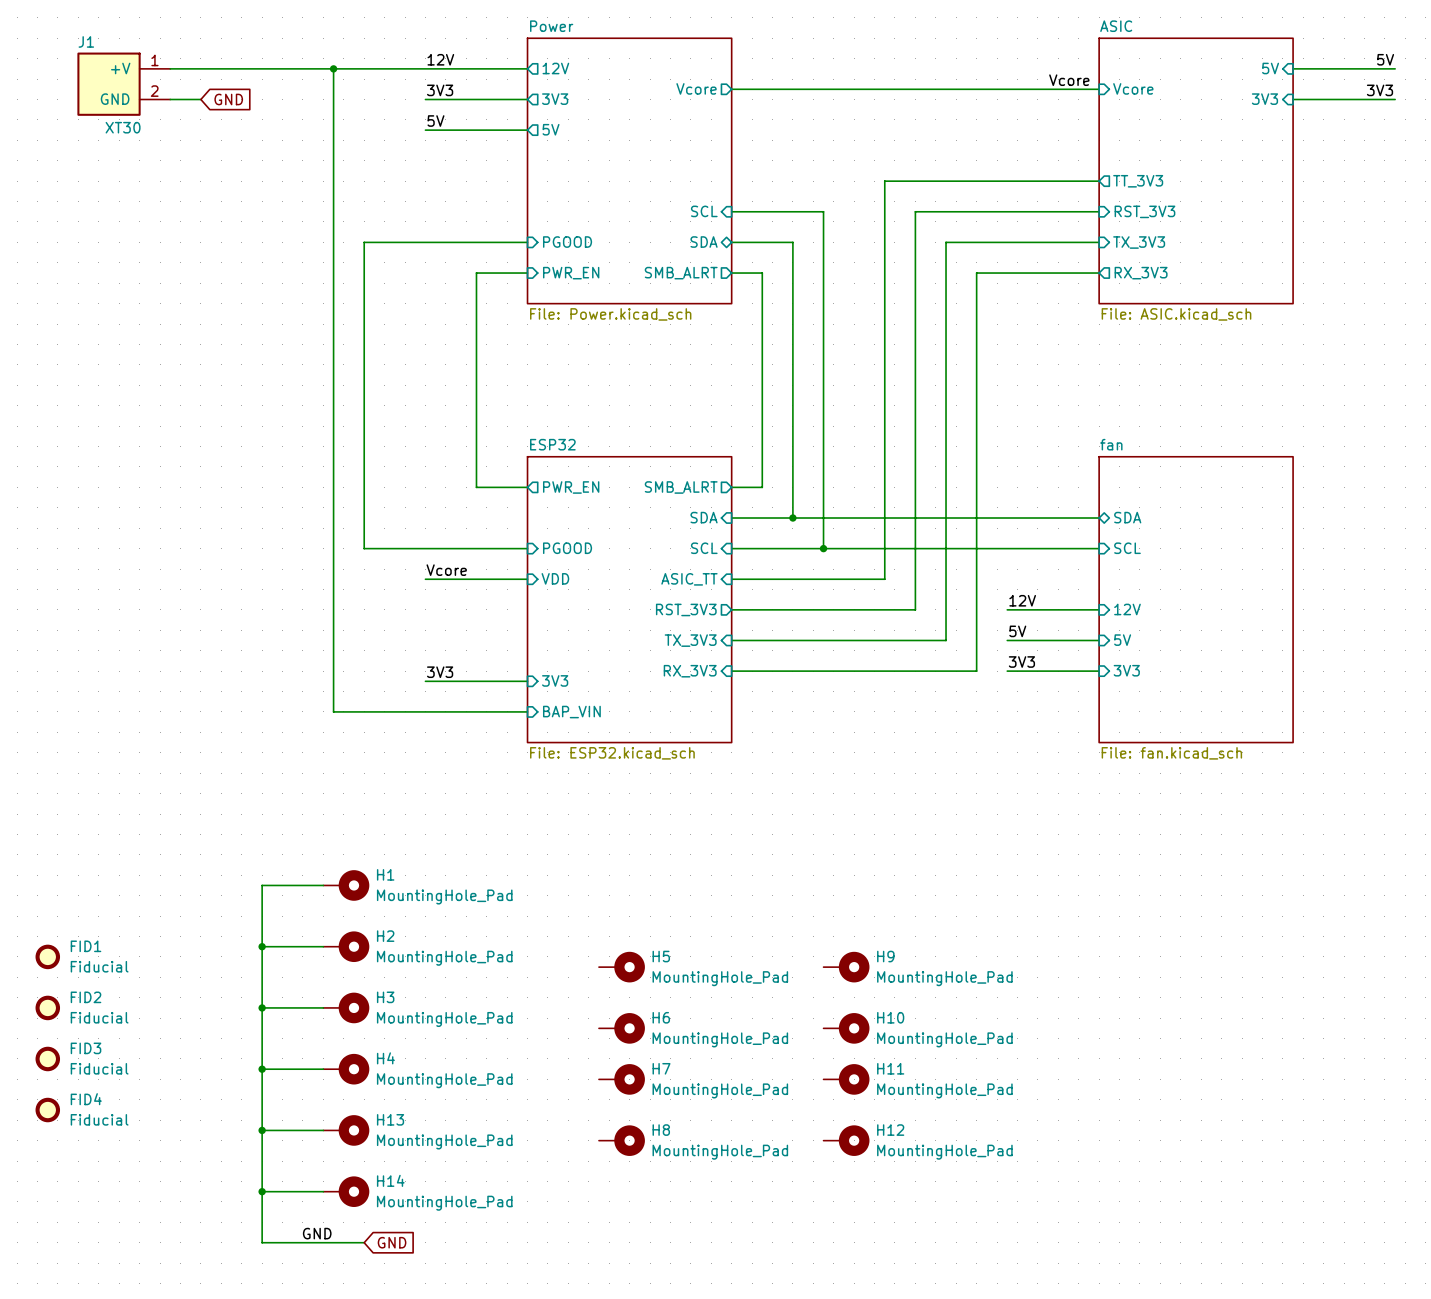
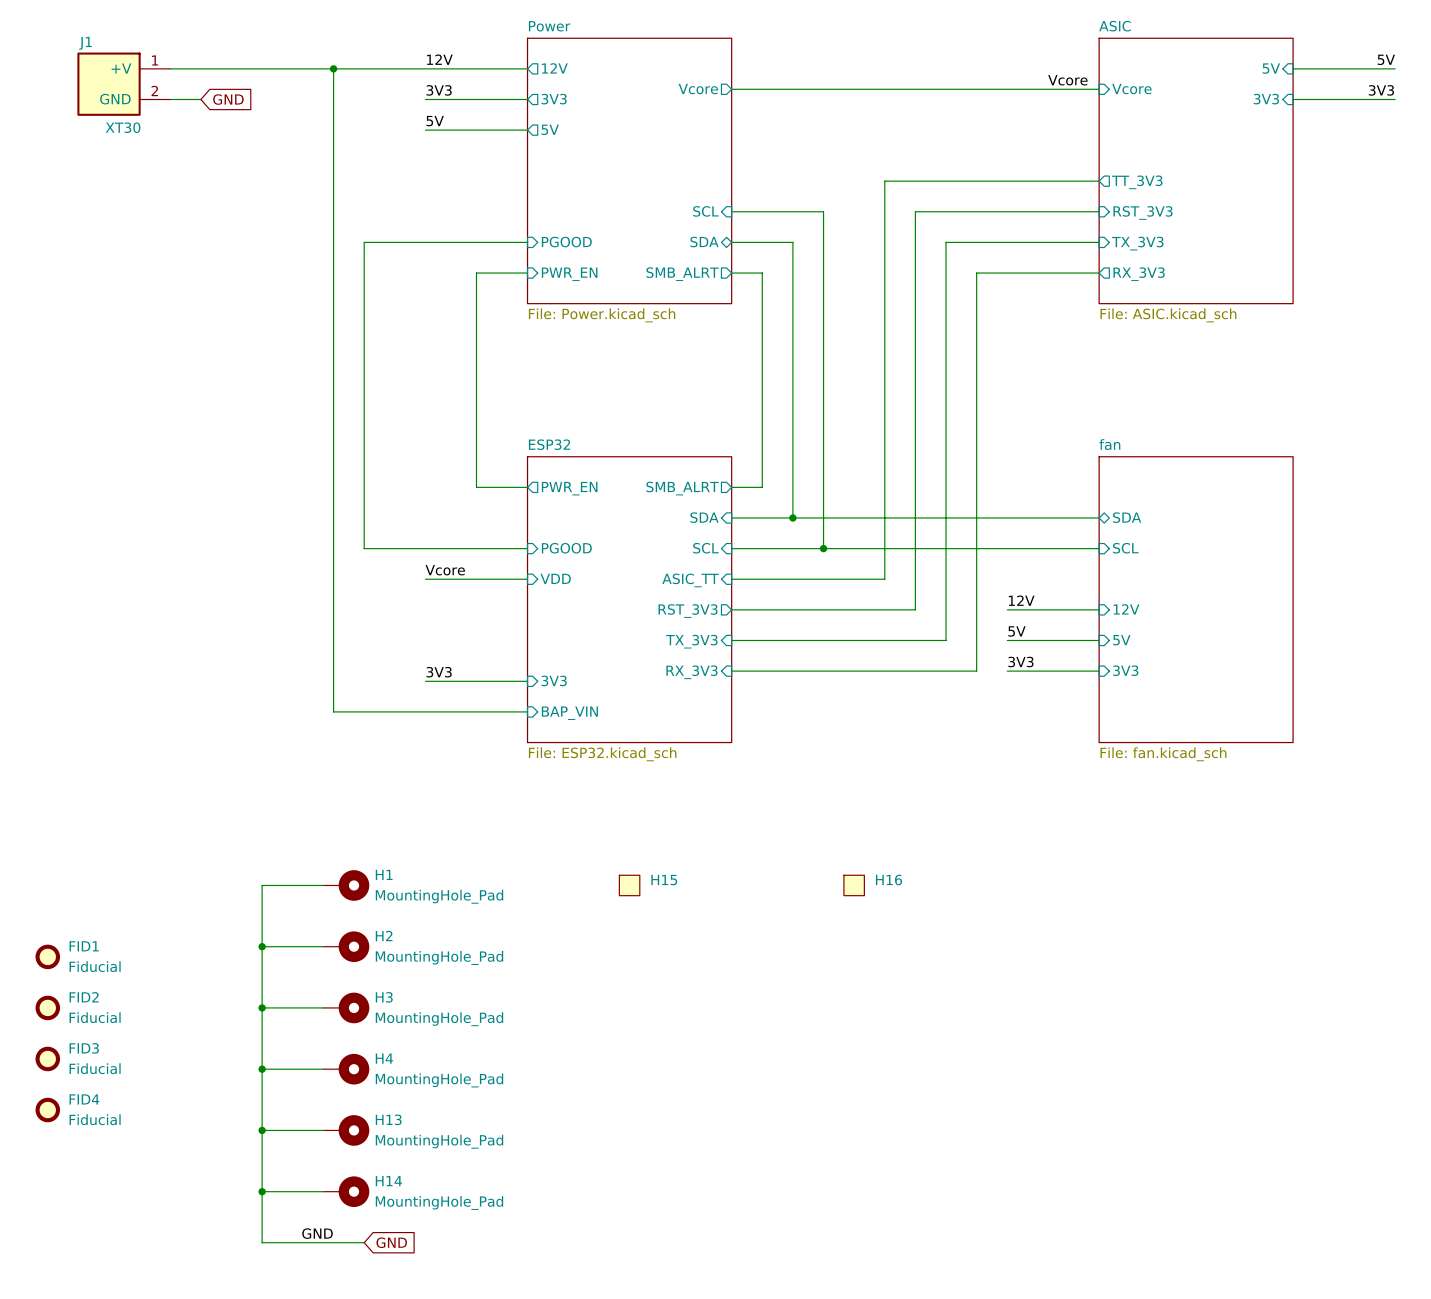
H15: none -> (629, 885)
H16: none -> (854, 885)
H5: MountingHole_Pad (621, 967) -> none
H9: MountingHole_Pad (846, 967) -> none
H6: MountingHole_Pad (621, 1028) -> none
H10: MountingHole_Pad (846, 1028) -> none
H7: MountingHole_Pad (621, 1079) -> none
H11: MountingHole_Pad (846, 1079) -> none
H8: MountingHole_Pad (621, 1140) -> none
H12: MountingHole_Pad (846, 1140) -> none

